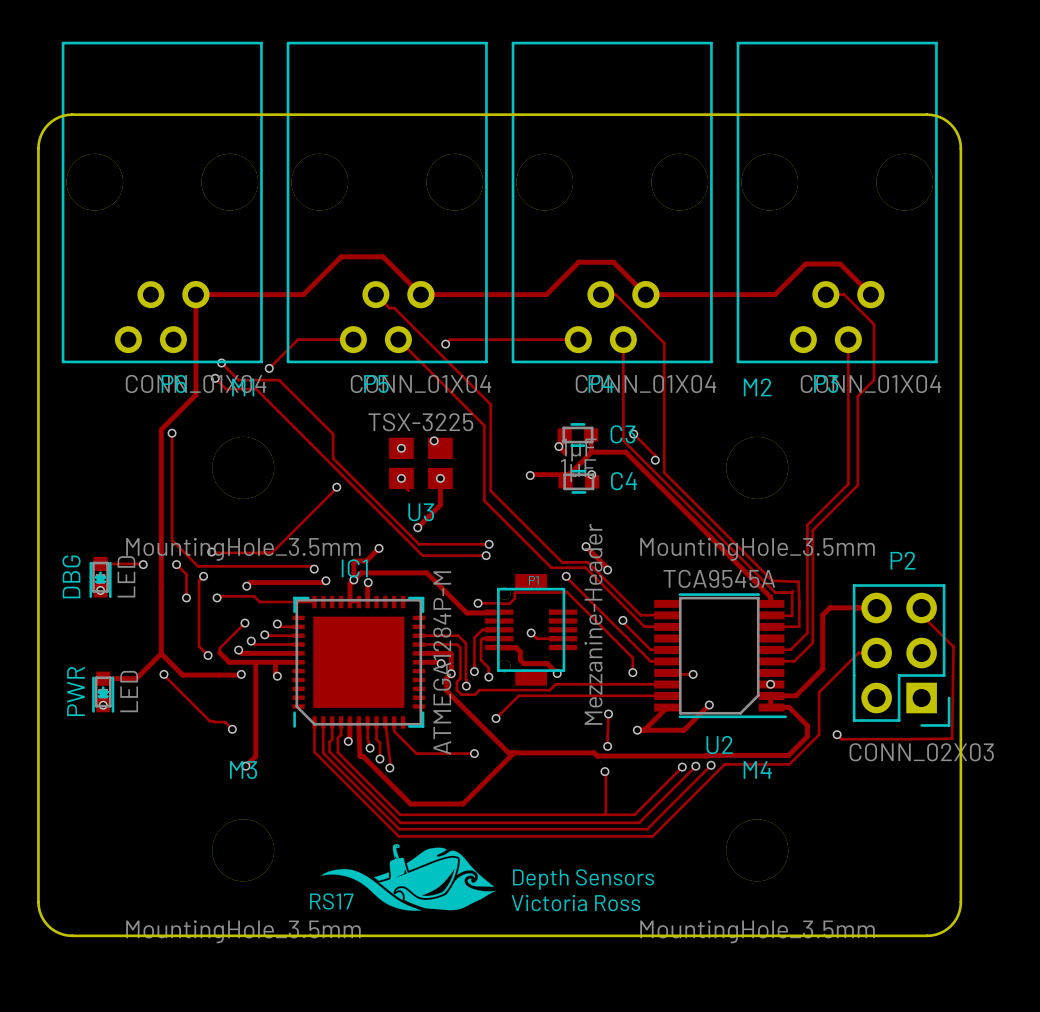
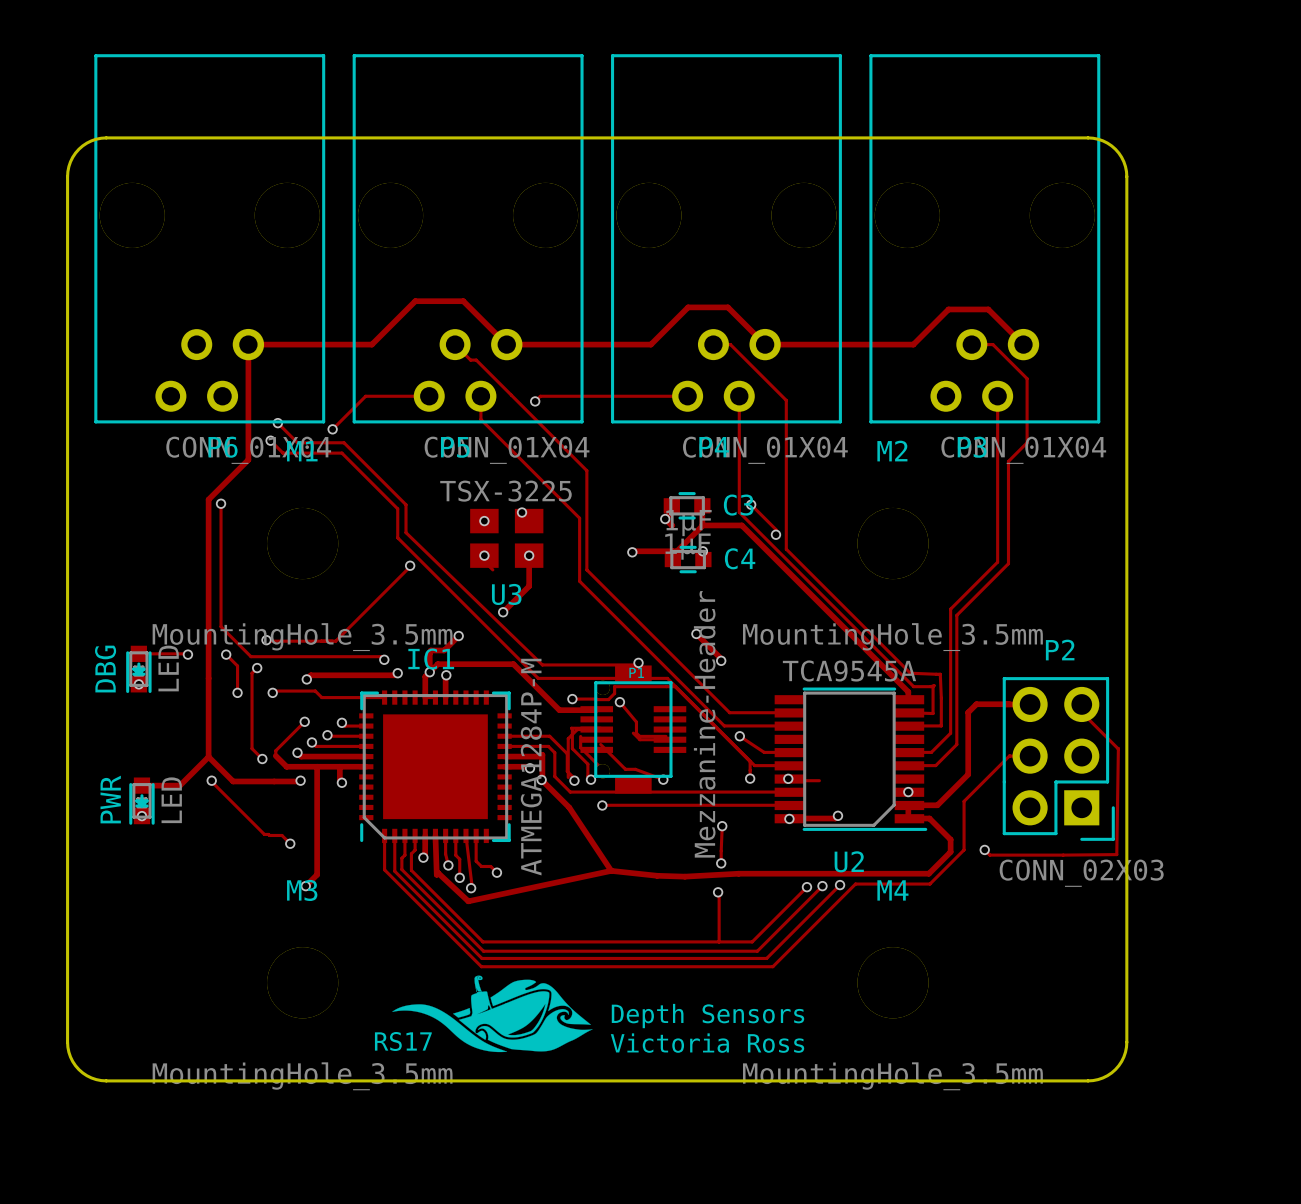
track: (398, 339) (484, 425) (484, 445) -> (480, 396) (480, 419) (579, 518)
track: (256, 389) (422, 555) (486, 555) -> (317, 453) (341, 453) (397, 508) (397, 537) (538, 678) (667, 678) (754, 765) (770, 765)
track: (333, 458) (419, 544) (489, 544) -> (406, 532) (542, 664) (636, 664)
via: (489, 544) -> none
via: (486, 555) -> none
track: (562, 562) (587, 562) (640, 615) -> (669, 652) (729, 712) (759, 712)
track: (551, 567) (585, 567) (644, 626) -> (656, 658) (724, 725) (763, 725)
via: none -> (638, 662)
track: (566, 576) (650, 661) -> none
via: (566, 576) -> none
track: none -> (619, 702) (636, 722) (636, 733) (639, 736) (666, 736)
via: none -> (619, 702)
track: (622, 620) (650, 649) -> (739, 736) (764, 752) (770, 752)
via position: (622, 620) -> (739, 736)
track: none -> (600, 728) (571, 728) (572, 748) (587, 764) (587, 776) (590, 779)
via: (531, 633) -> none
track: none -> (580, 736) (580, 747) (599, 766)
track: (499, 638) (481, 640) (481, 660) (488, 668) (488, 677) -> none
track: none -> (600, 744) (625, 769)
track: (465, 643) (466, 686) -> (558, 744) (567, 753) (567, 771) (574, 780)
track: (460, 647) (460, 678) (456, 682) (456, 690) (461, 694) (474, 694) (479, 690) (549, 690) (555, 684) -> (552, 750) (554, 752) (554, 776) (570, 792) (661, 792)
track: (499, 647) (516, 647) (520, 651) (520, 660) (523, 663) (547, 663) (557, 673) -> (635, 769) (663, 779)
track: (450, 653) (451, 673) (446, 678) (446, 691) (508, 752) (594, 752) (597, 756) (706, 755) -> (611, 870) (684, 876) (738, 873) (834, 873)
track: none -> (540, 756) (542, 754) (542, 780) (569, 807) (611, 870)
via: (474, 671) -> none
via: none -> (788, 778)
via: none -> (590, 779)
via: none -> (574, 780)
via: (693, 674) -> none
via: (488, 677) -> none
via: (466, 686) -> none
track: (518, 695) (496, 718) -> (619, 805) (602, 805)
via: none -> (602, 805)
track: (667, 707) (644, 730) -> none
via: none -> (789, 818)
track: (707, 707) (684, 730) (637, 730) -> (835, 818) (789, 818)
via: (496, 718) -> none
via: (637, 730) -> none
track: (394, 731) (416, 753) (474, 753) -> (476, 846) (476, 861) (481, 866) (490, 866) (496, 872)
track: (514, 752) (462, 803) (410, 803) (362, 756) (359, 756) -> (611, 870) (468, 901) (438, 873) (436, 874)
via: (474, 753) -> none
via: none -> (496, 872)

